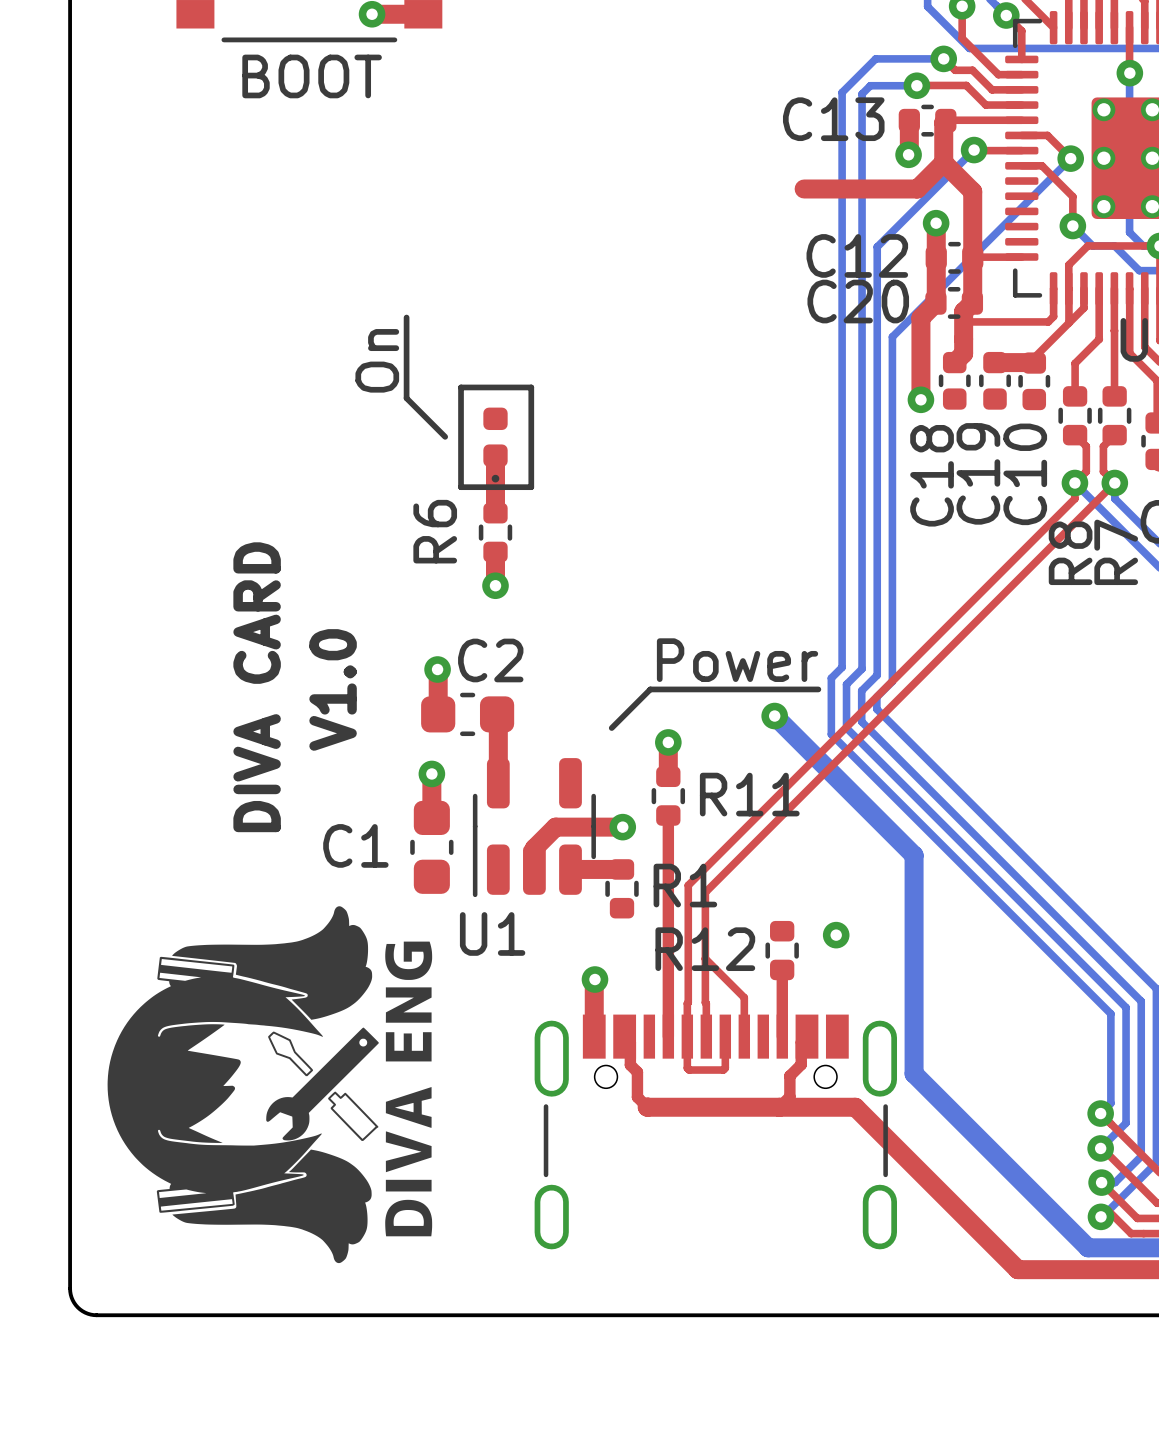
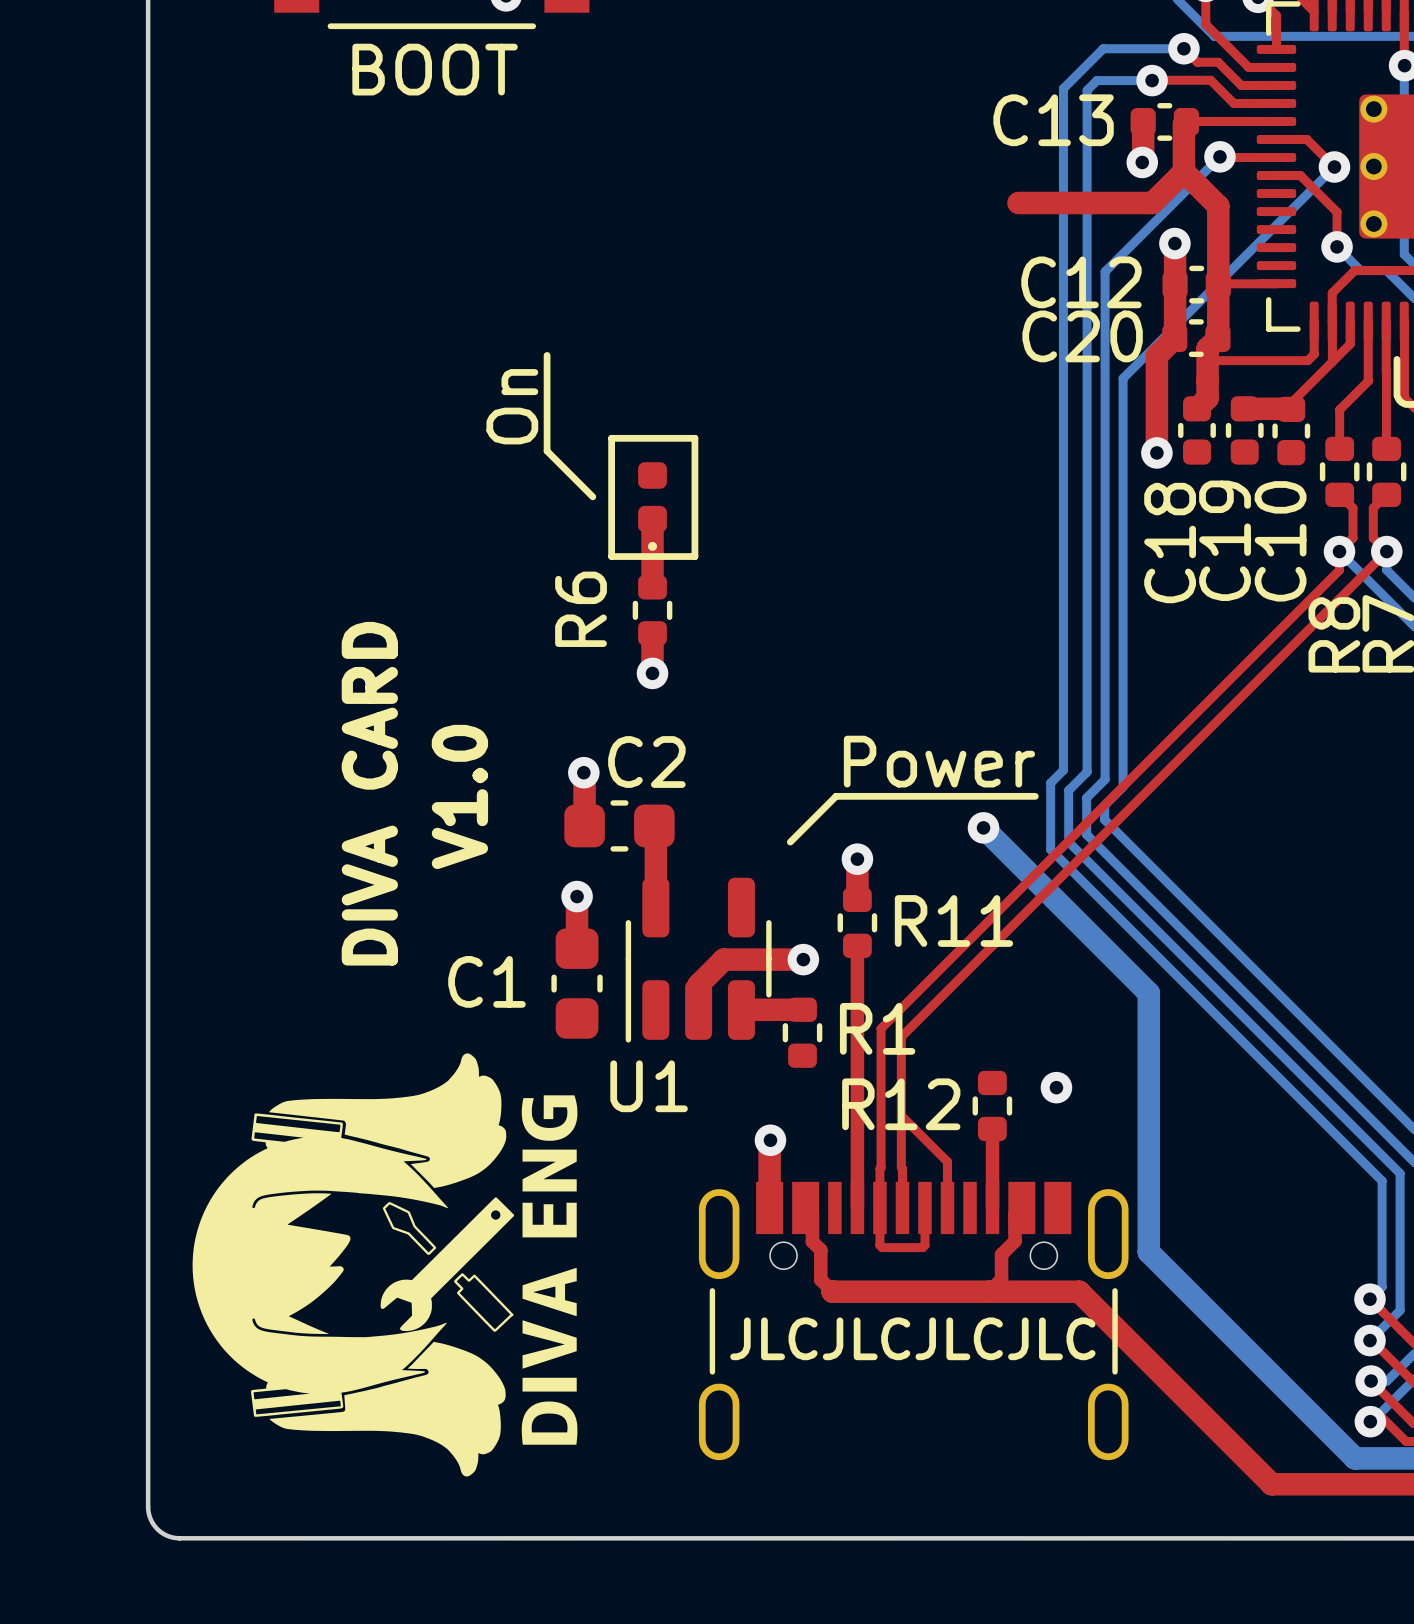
text: none -> JLCJLCJLCJLC (912, 1338)

